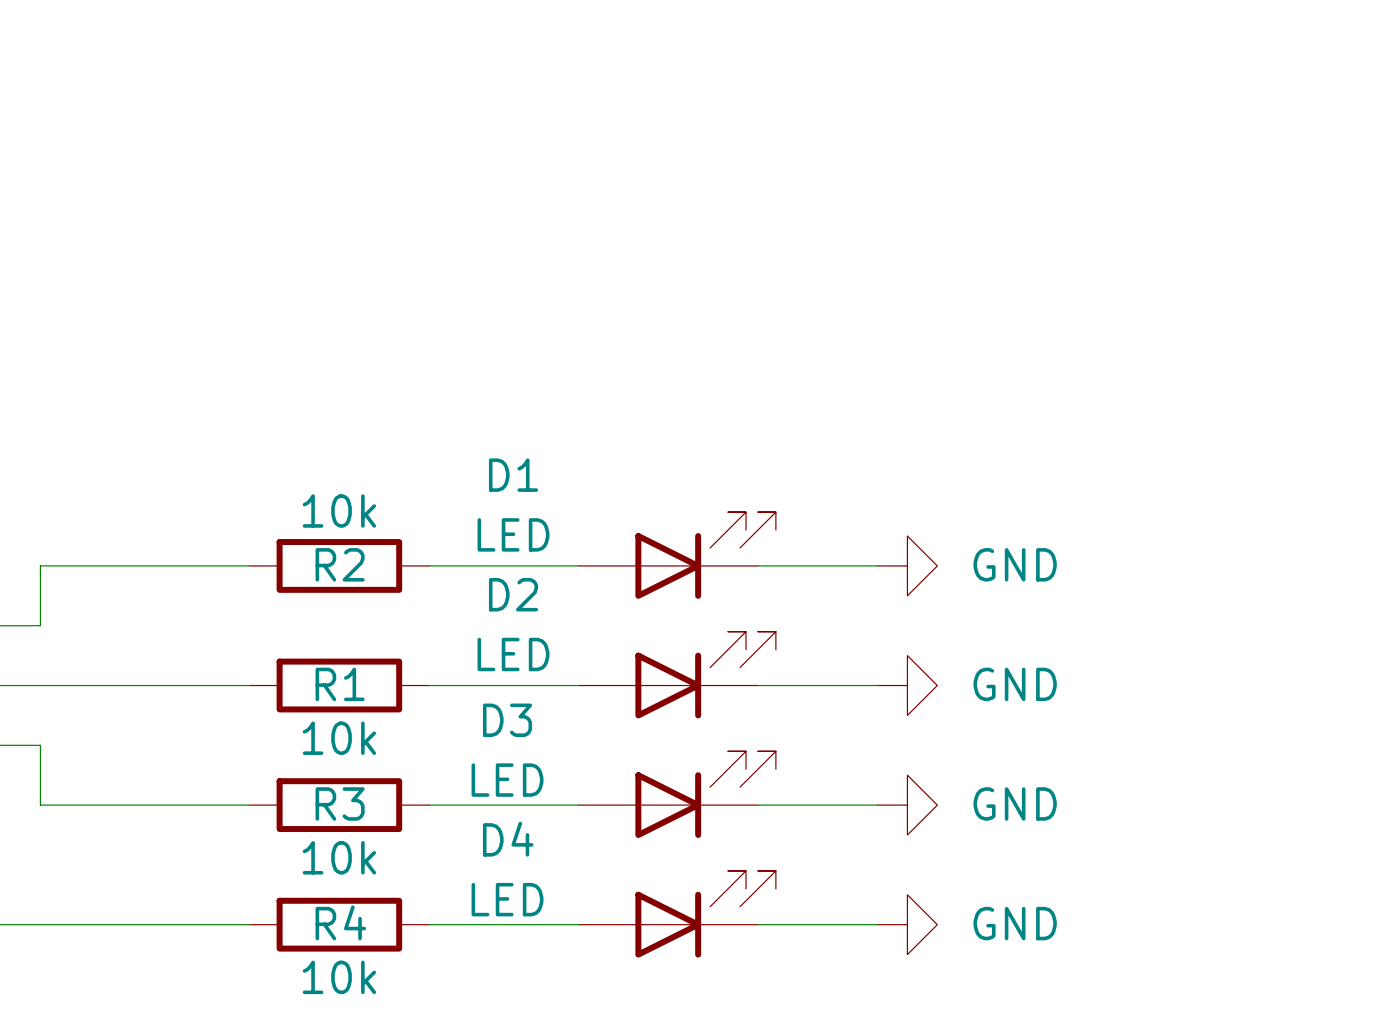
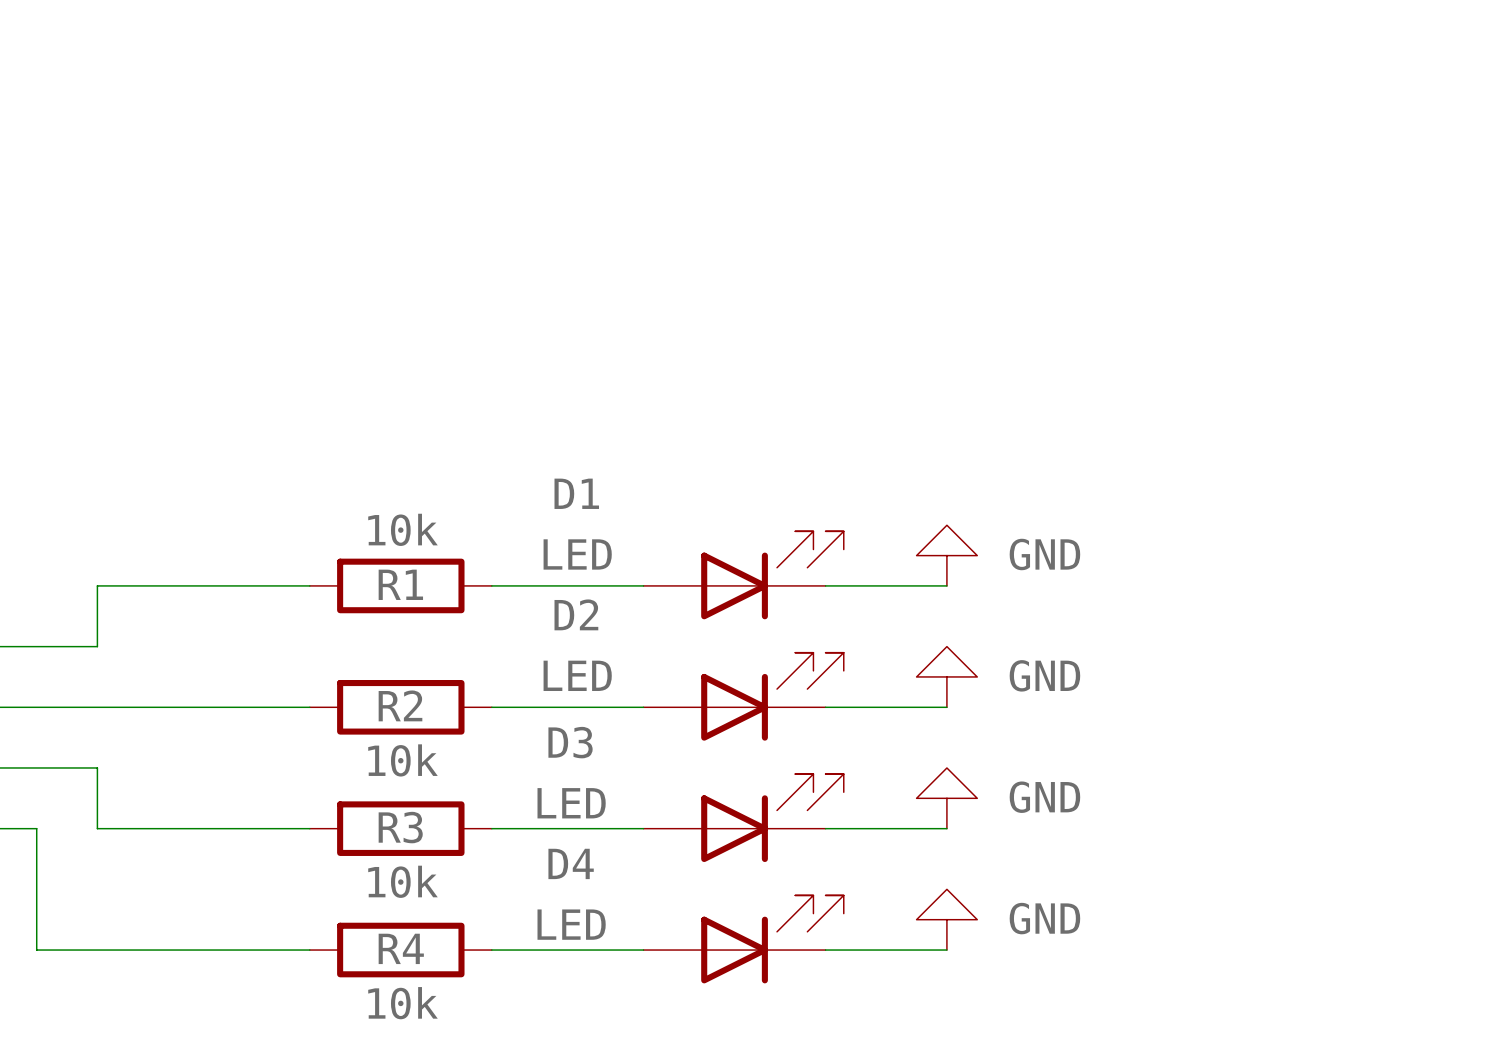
R2 name: R2 (340, 564) -> R1 (400, 584)
power symbol rotation: 0° (907, 565) -> 90° counterclockwise (946, 555)
power symbol position: GND (907, 565) -> GND (946, 555)
R1 name: R1 (340, 684) -> R2 (400, 705)
power symbol rotation: 0° (907, 685) -> 90° counterclockwise (946, 676)
power symbol position: GND (907, 685) -> GND (946, 676)
power symbol rotation: 0° (907, 805) -> 90° counterclockwise (946, 798)
power symbol position: GND (907, 805) -> GND (946, 798)
power symbol rotation: 0° (907, 924) -> 90° counterclockwise (946, 919)
power symbol position: GND (907, 924) -> GND (946, 919)

